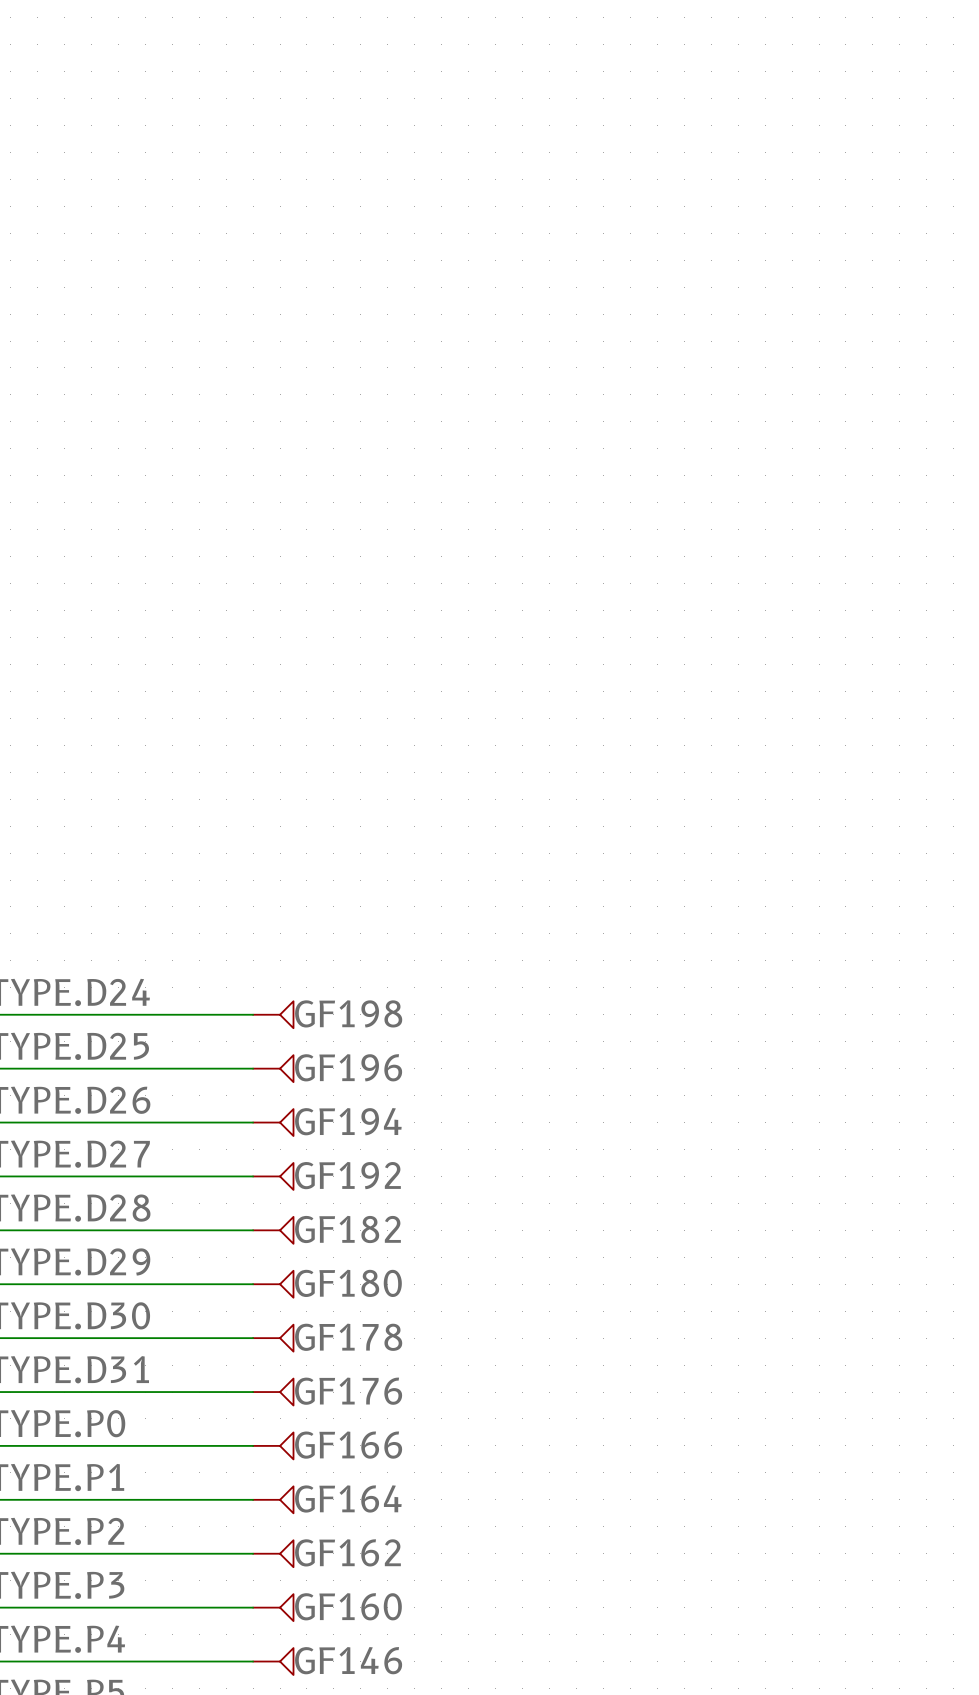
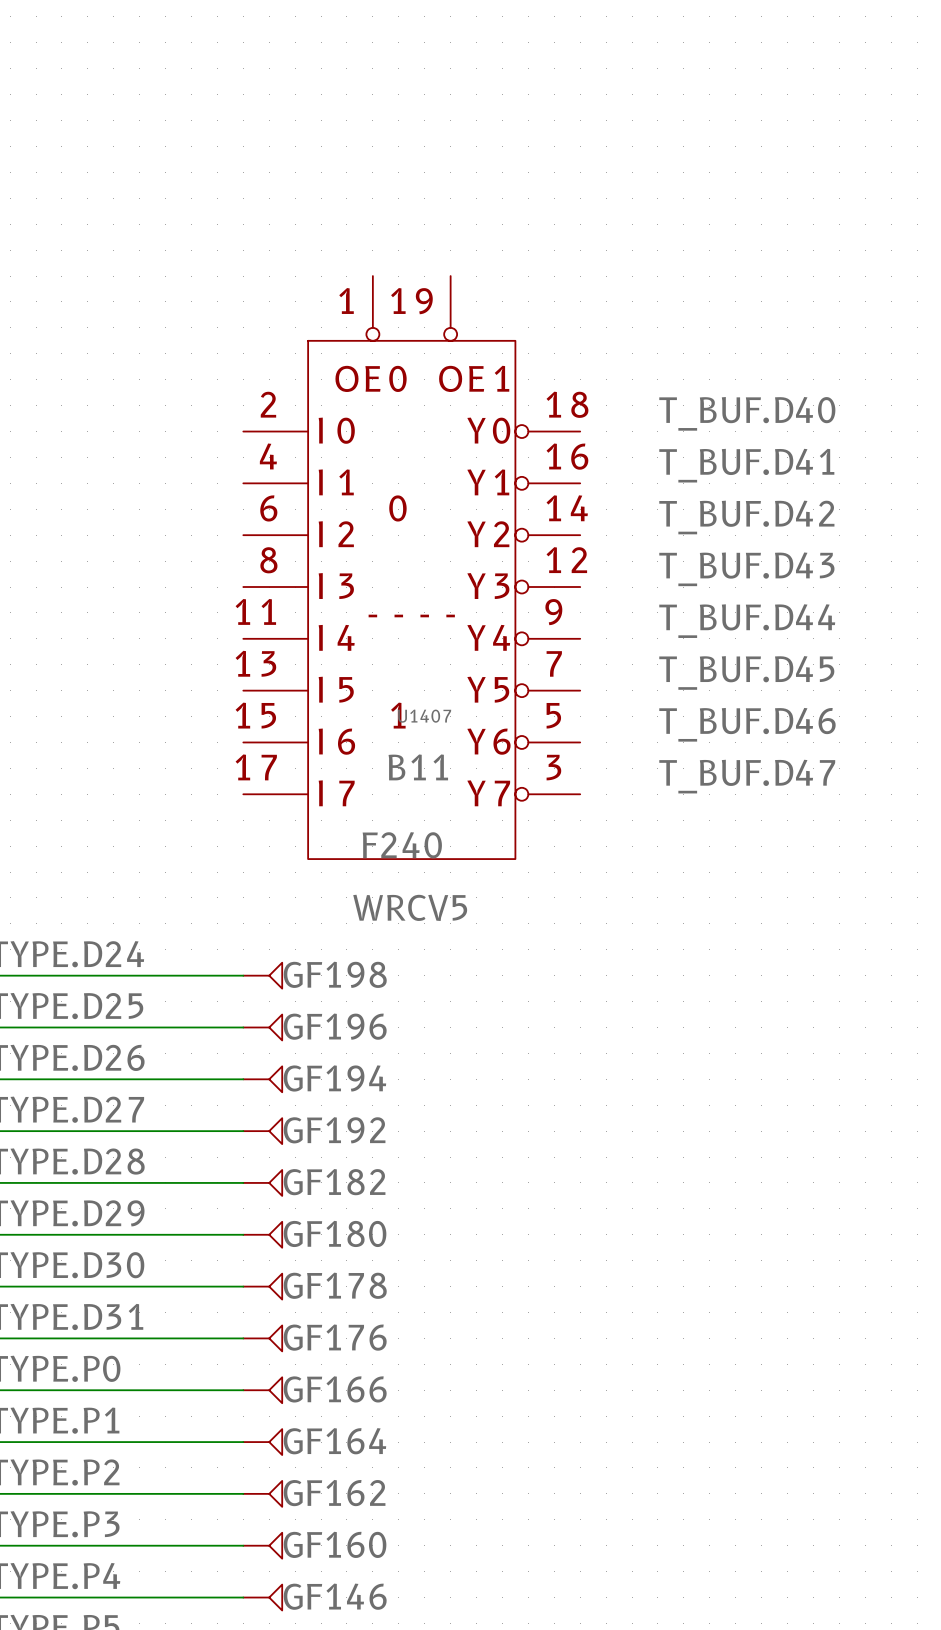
label: none -> T_BUF.D40 (747, 413)
label: none -> T_BUF.D41 (746, 465)
label: none -> T_BUF.D42 (746, 517)
U1407: none -> F240 (411, 567)
label: none -> T_BUF.D43 (746, 569)
label: none -> T_BUF.D44 (747, 621)
label: none -> T_BUF.D45 (746, 672)
label: none -> T_BUF.D46 (747, 724)
label: none -> T_BUF.D47 (747, 776)

